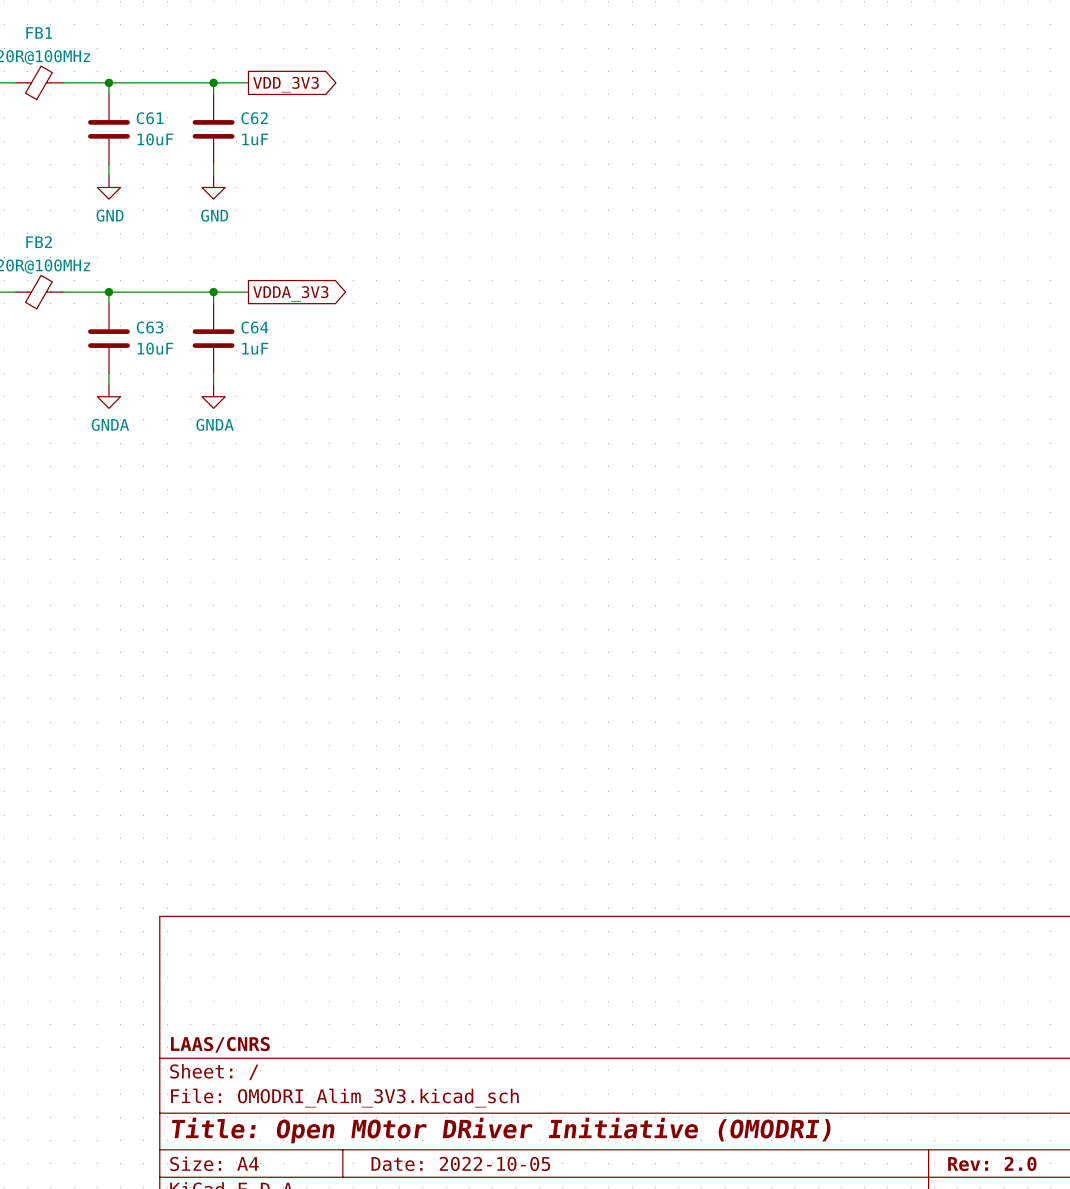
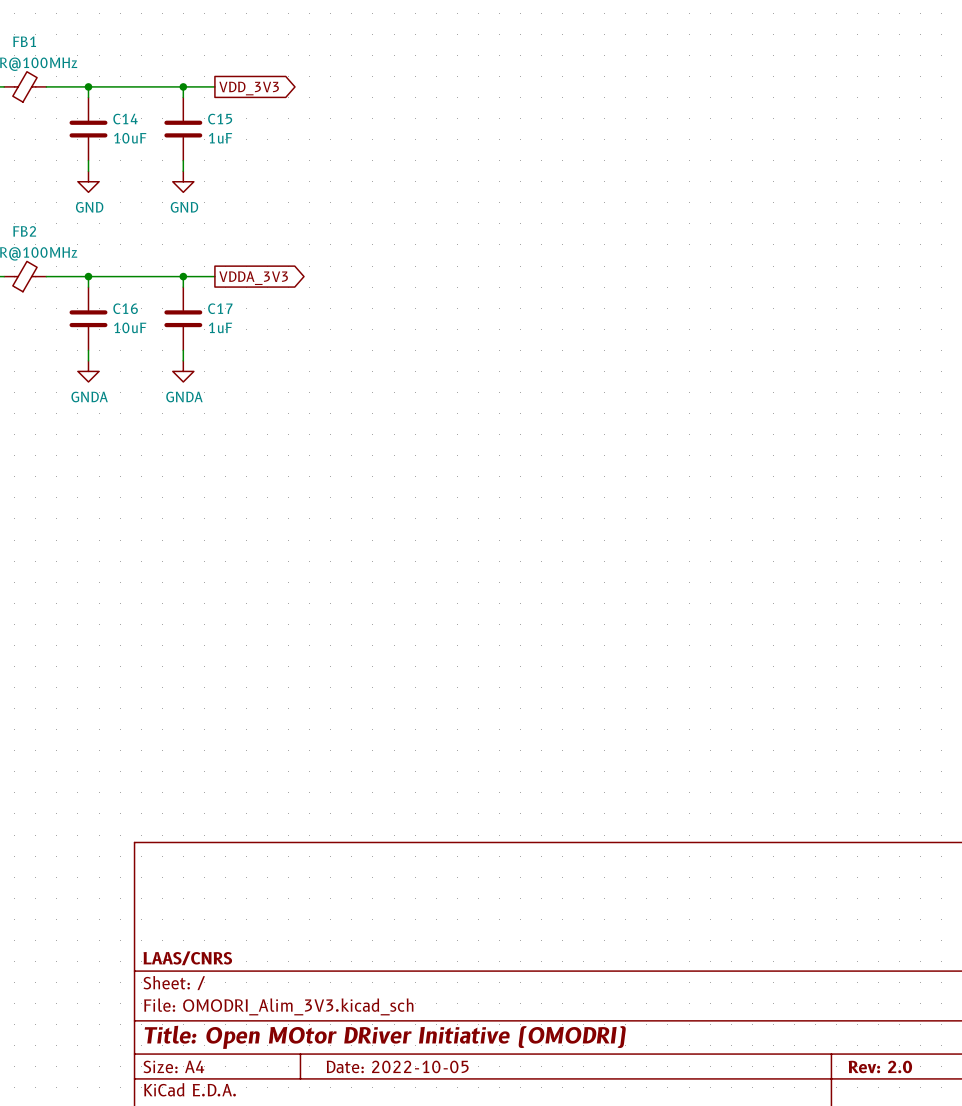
C61 name: C61 (150, 118) -> C14 (125, 119)
C62 name: C62 (254, 118) -> C15 (220, 119)
C63 name: C63 (150, 327) -> C16 (125, 308)
C64 name: C64 (254, 327) -> C17 (220, 308)

